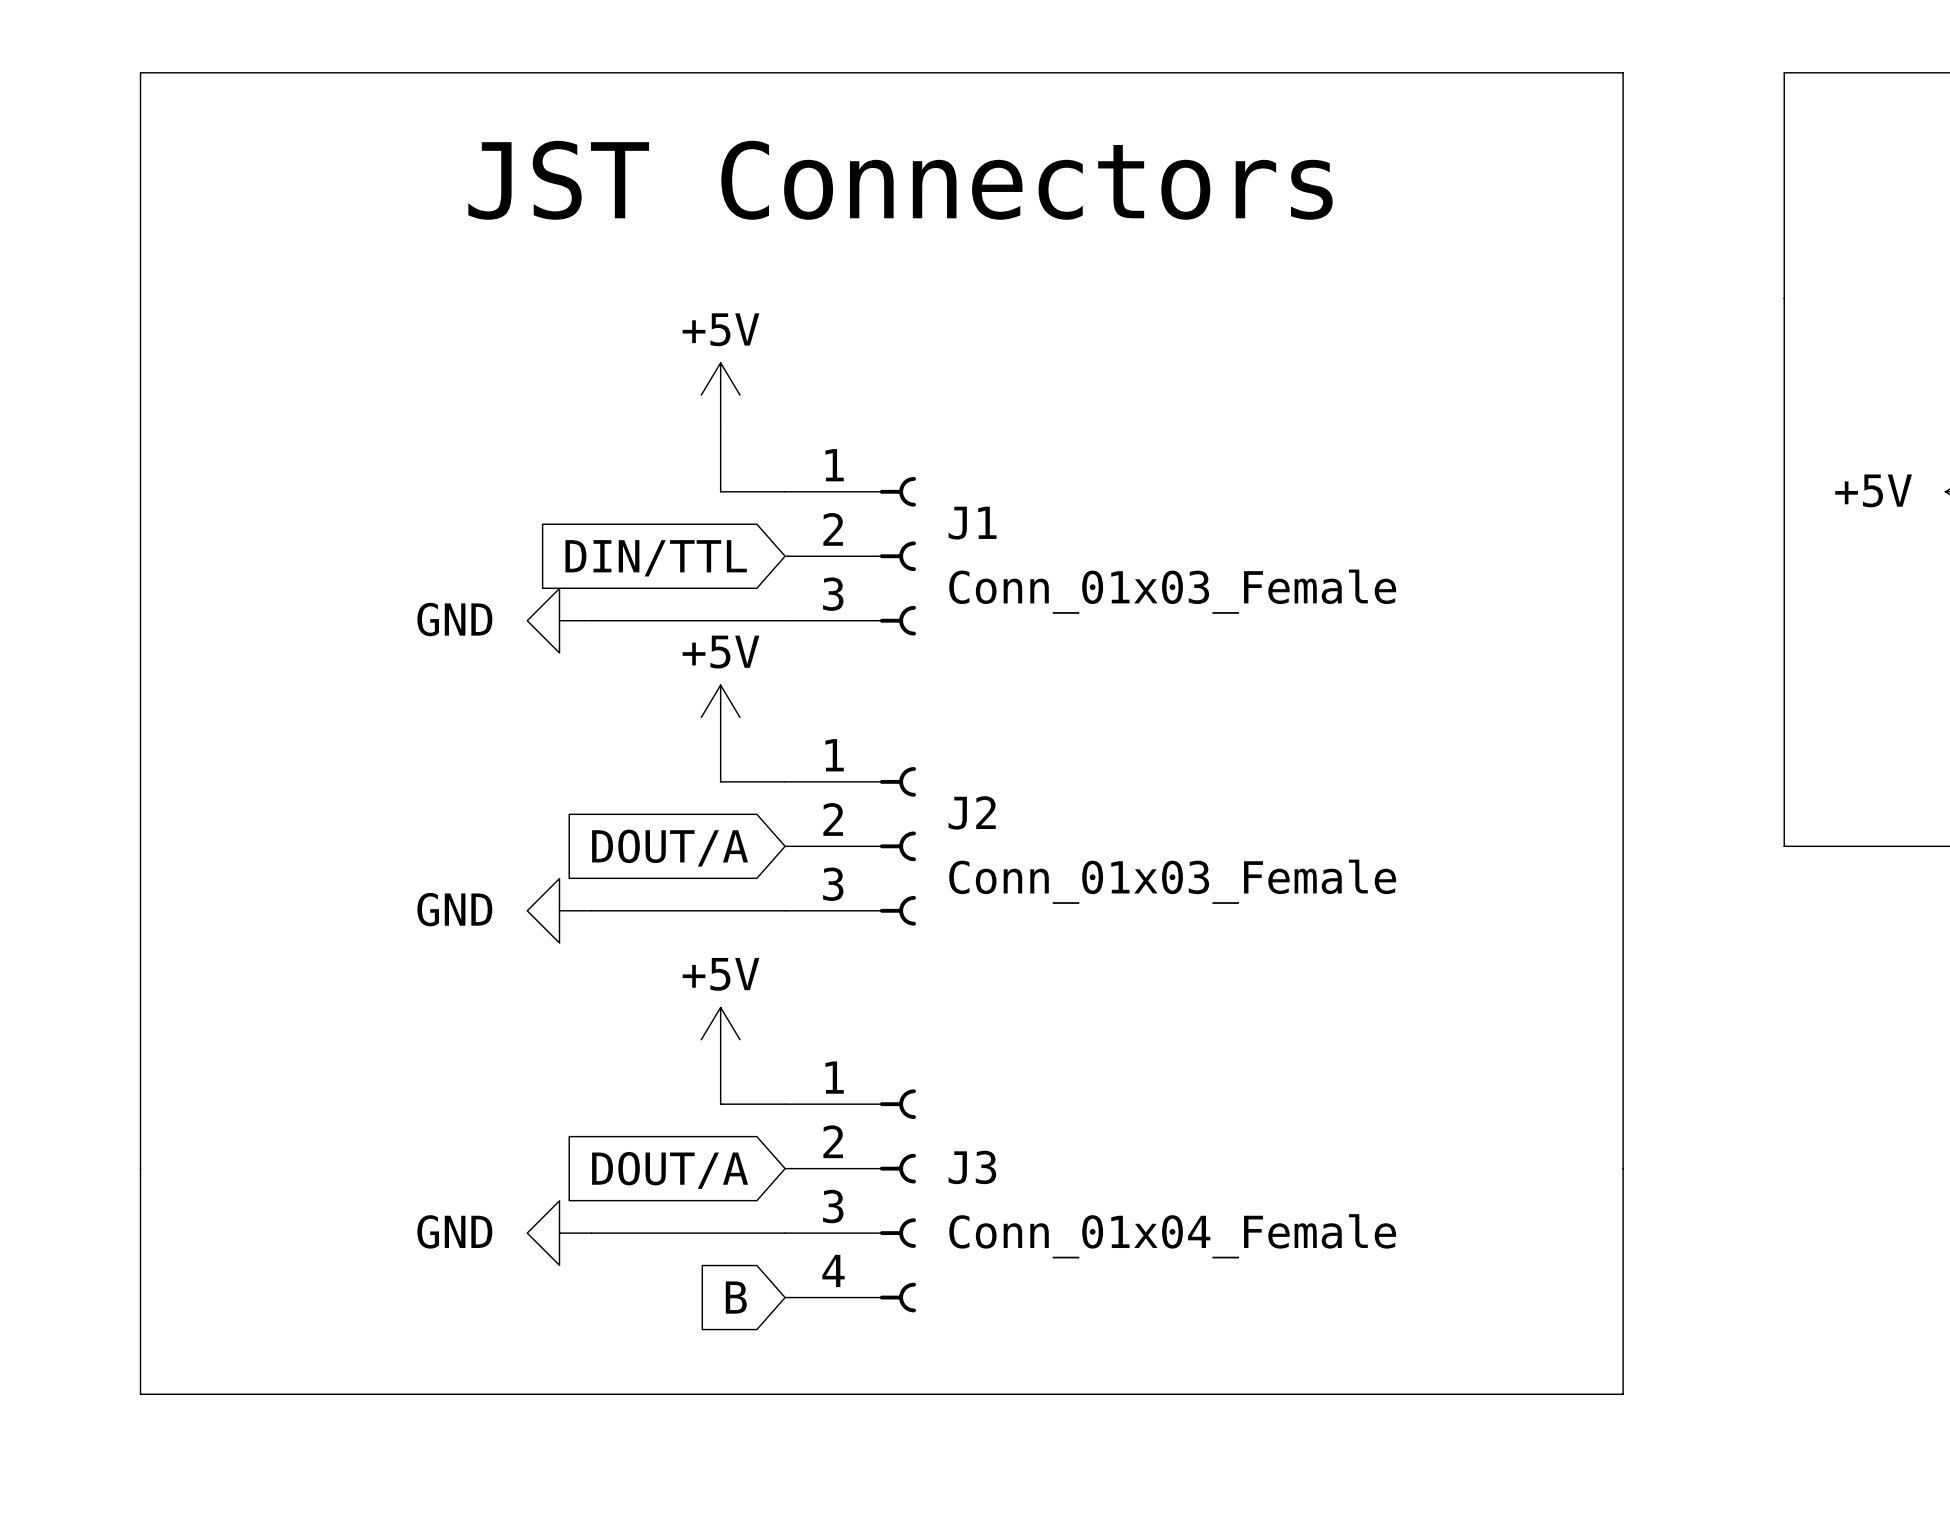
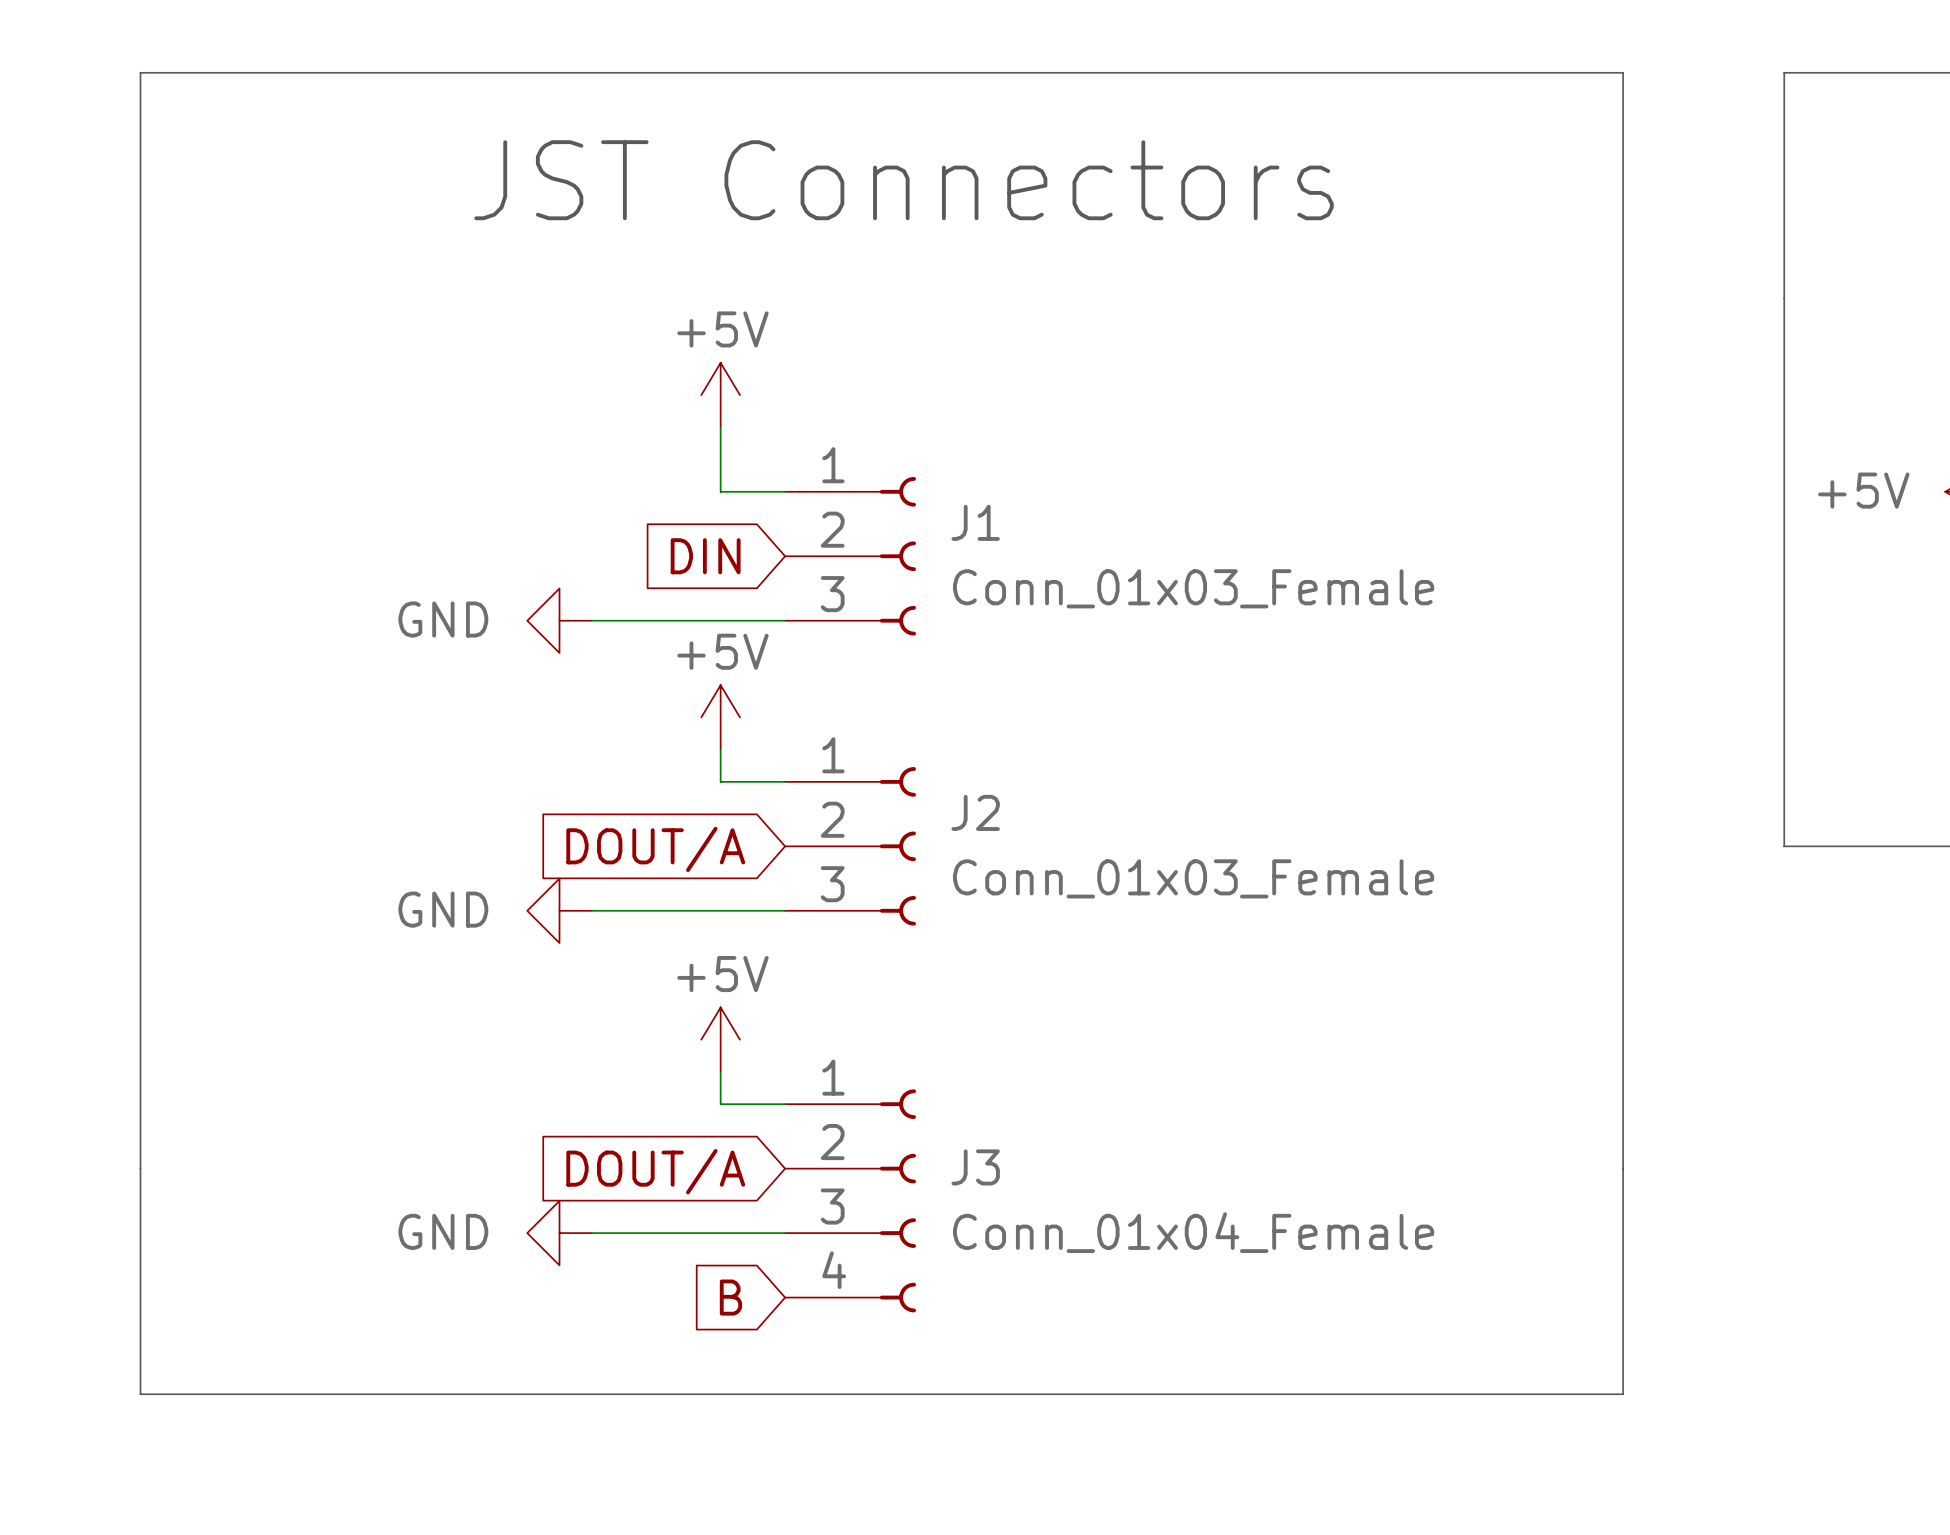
global label: DIN/TTL (656, 558) -> DIN (705, 556)

